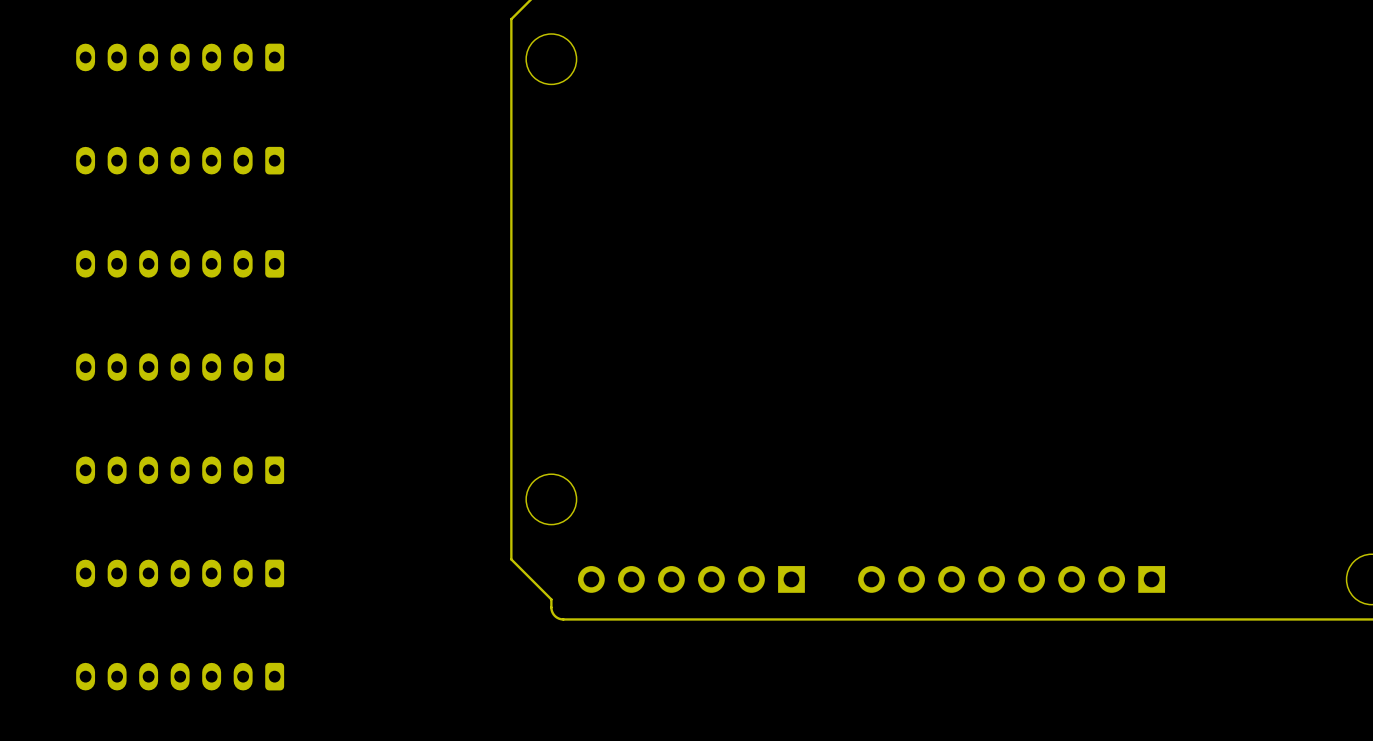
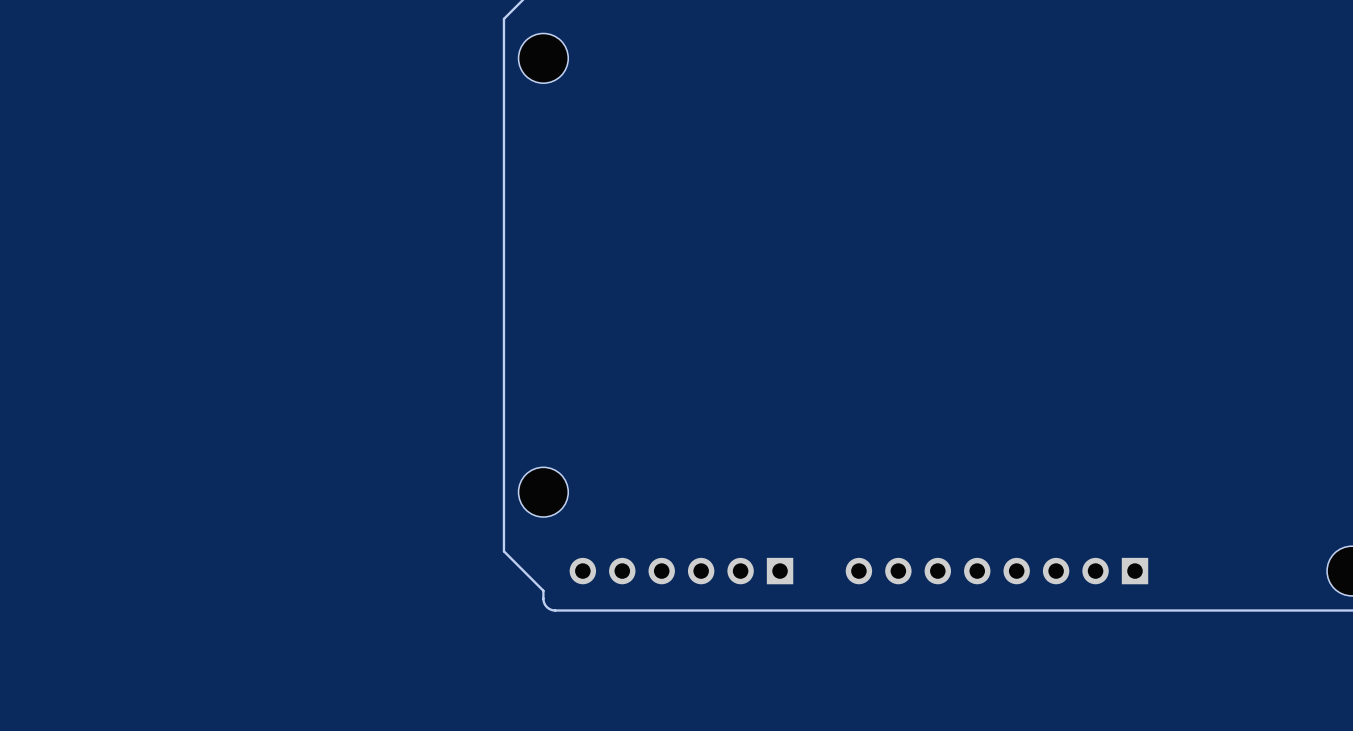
part: (180, 57) -> none
part: (180, 160) -> none
part: (180, 263) -> none
part: (180, 367) -> none
part: (180, 470) -> none
part: (180, 573) -> none
part: (180, 676) -> none

